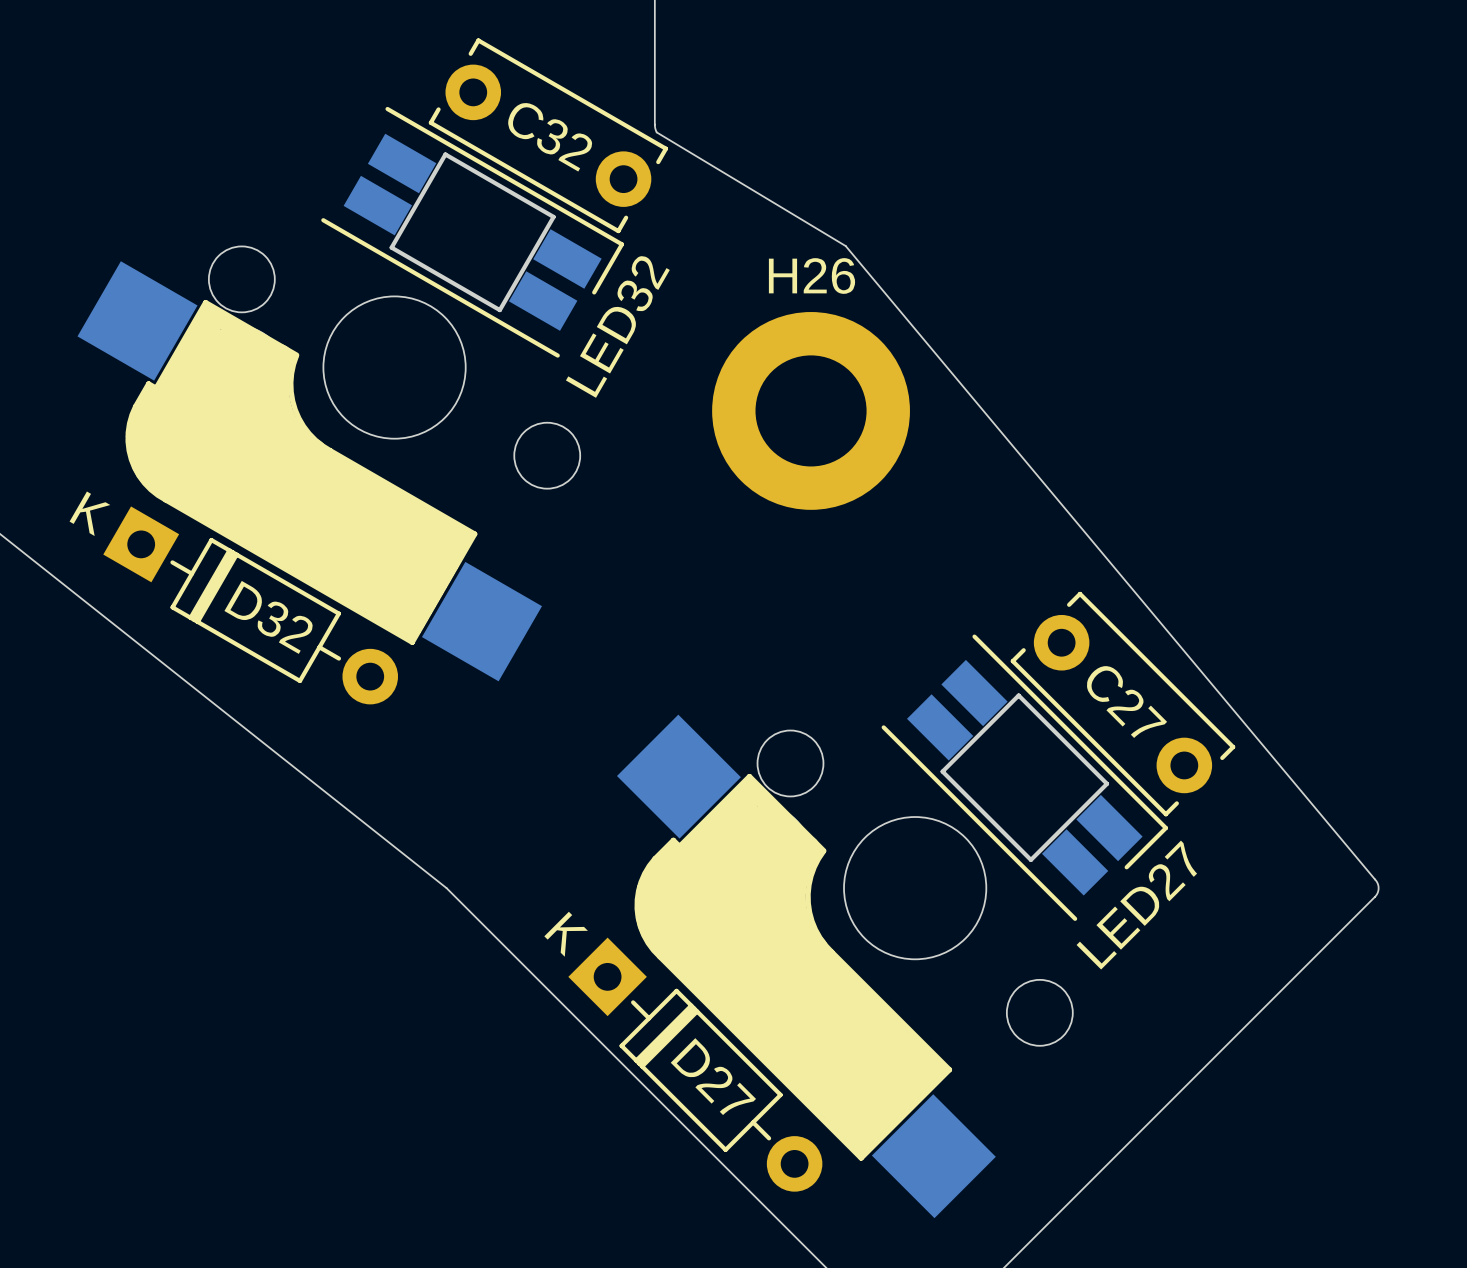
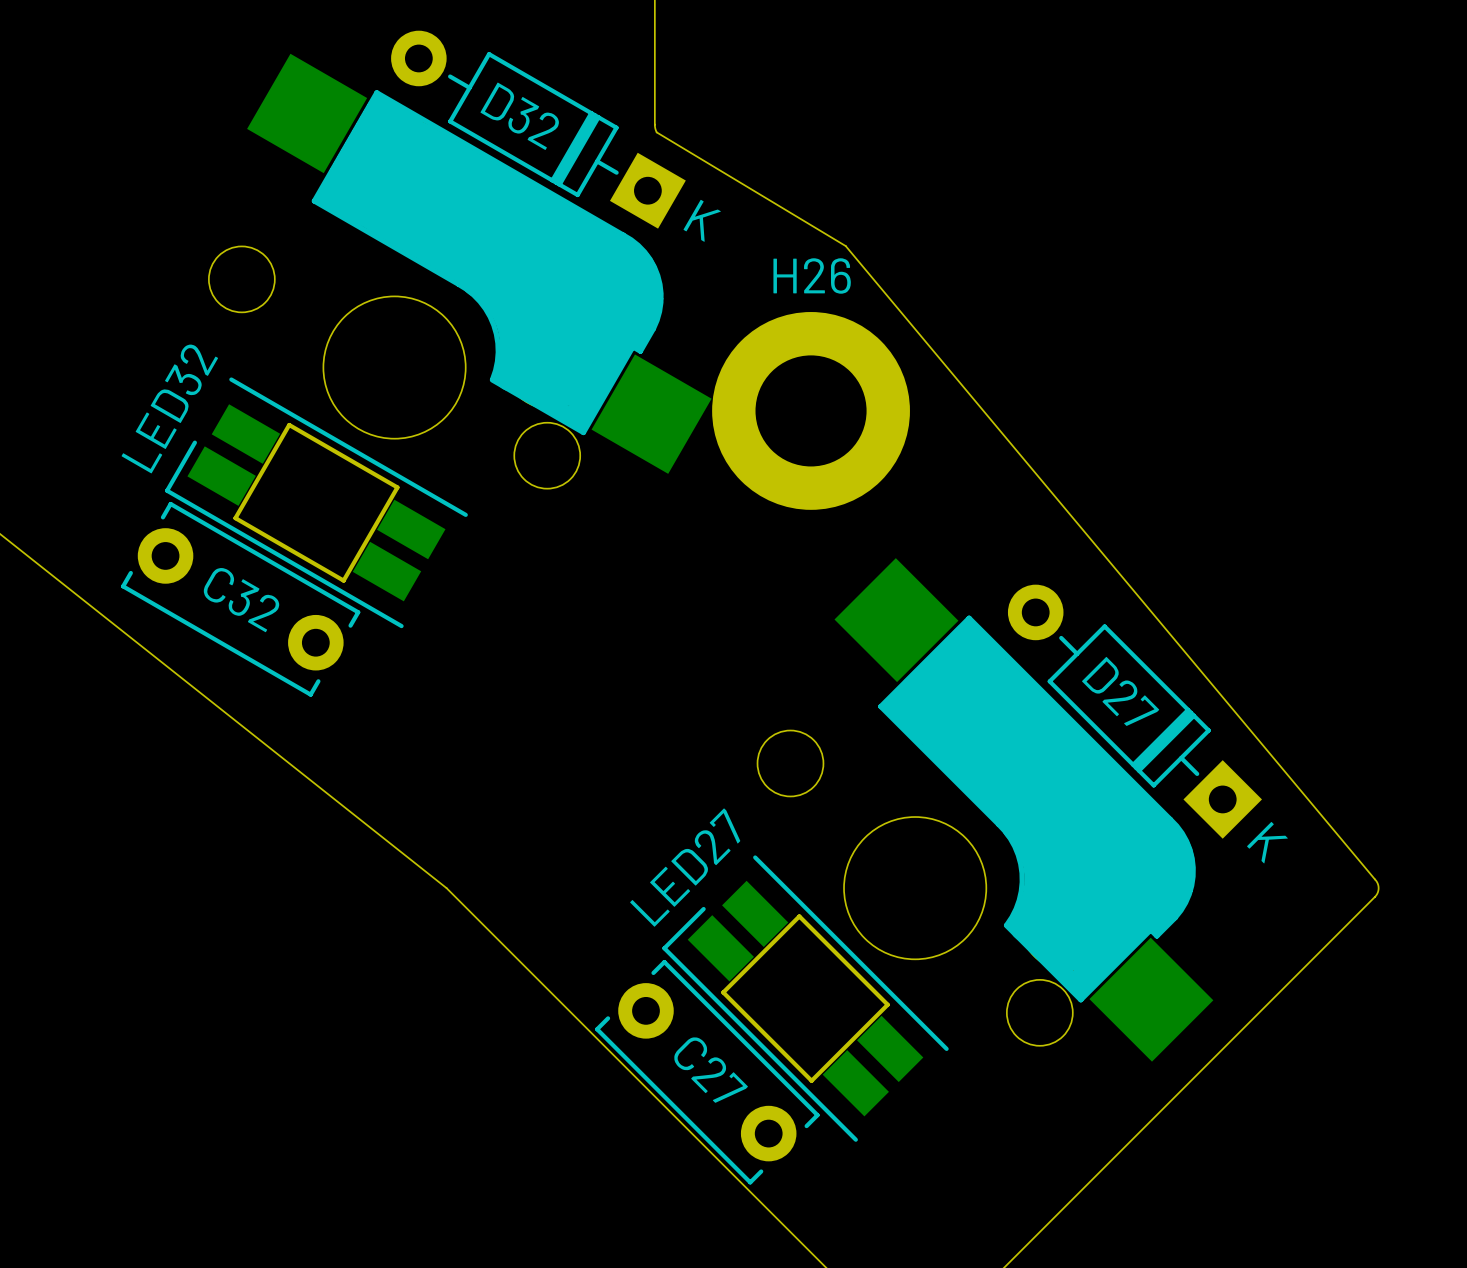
C32 position: (548, 135) -> (240, 599)
LED32 rotation: 0° (472, 232) -> 180° (316, 502)
LED32 position: (472, 232) -> (316, 502)
part rotation: 0° (328, 463) -> 180° (460, 271)
D32 rotation: 0° (250, 605) -> 180° (538, 129)
D32 position: (250, 605) -> (538, 129)
C27 position: (1122, 704) -> (707, 1072)
LED27 rotation: 0° (1024, 777) -> 180° (805, 998)
LED27 position: (1024, 777) -> (805, 998)
part rotation: 0° (844, 966) -> 180° (985, 809)
D27 rotation: 0° (695, 1064) -> 180° (1134, 711)
D27 position: (695, 1064) -> (1134, 711)

